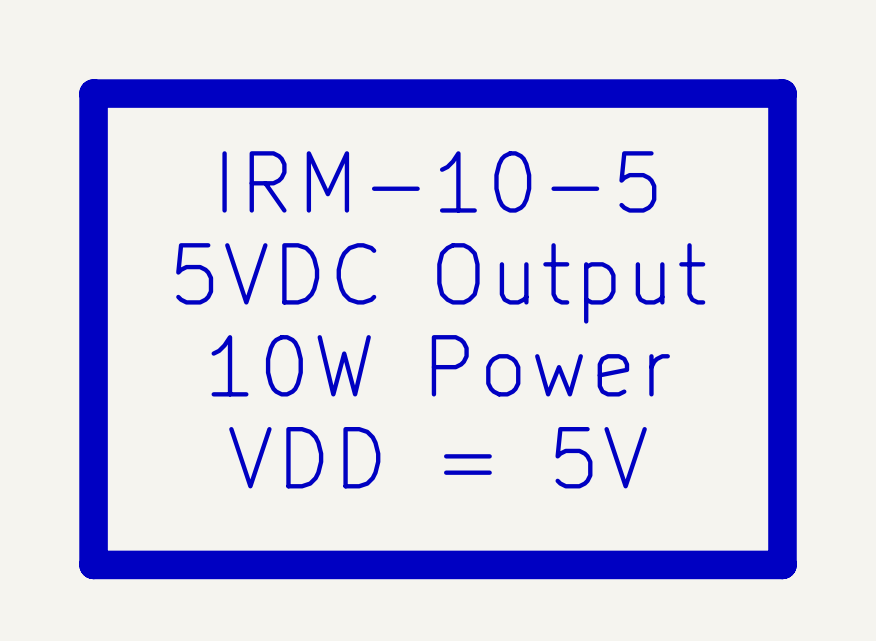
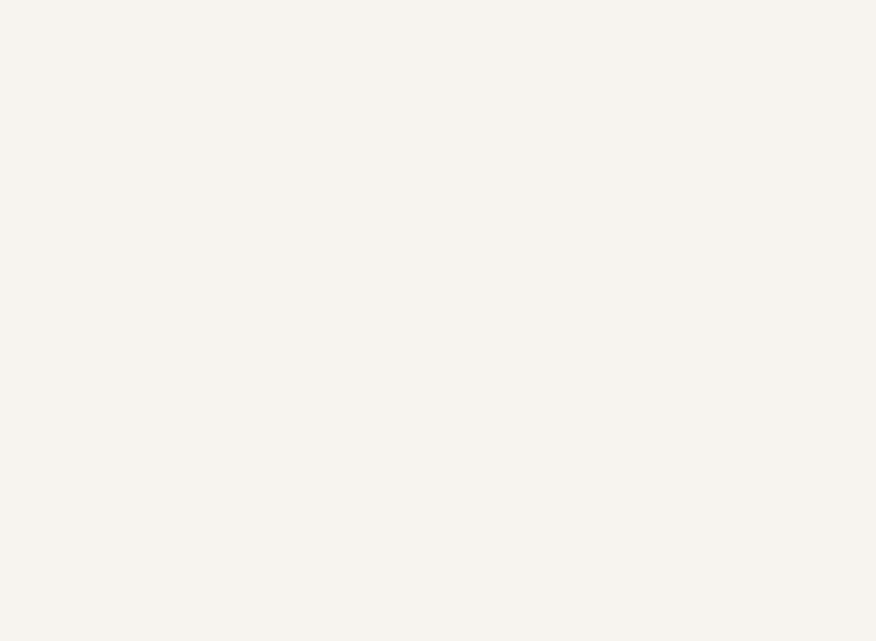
line: (93, 93) (782, 93) (782, 564) (93, 564) (93, 93) -> none
text: IRM-10-5 (439, 181) -> none
text: 5VDC Output (440, 283) -> none
text: 10W Power (440, 365) -> none
text: VDD = 5V (438, 457) -> none

